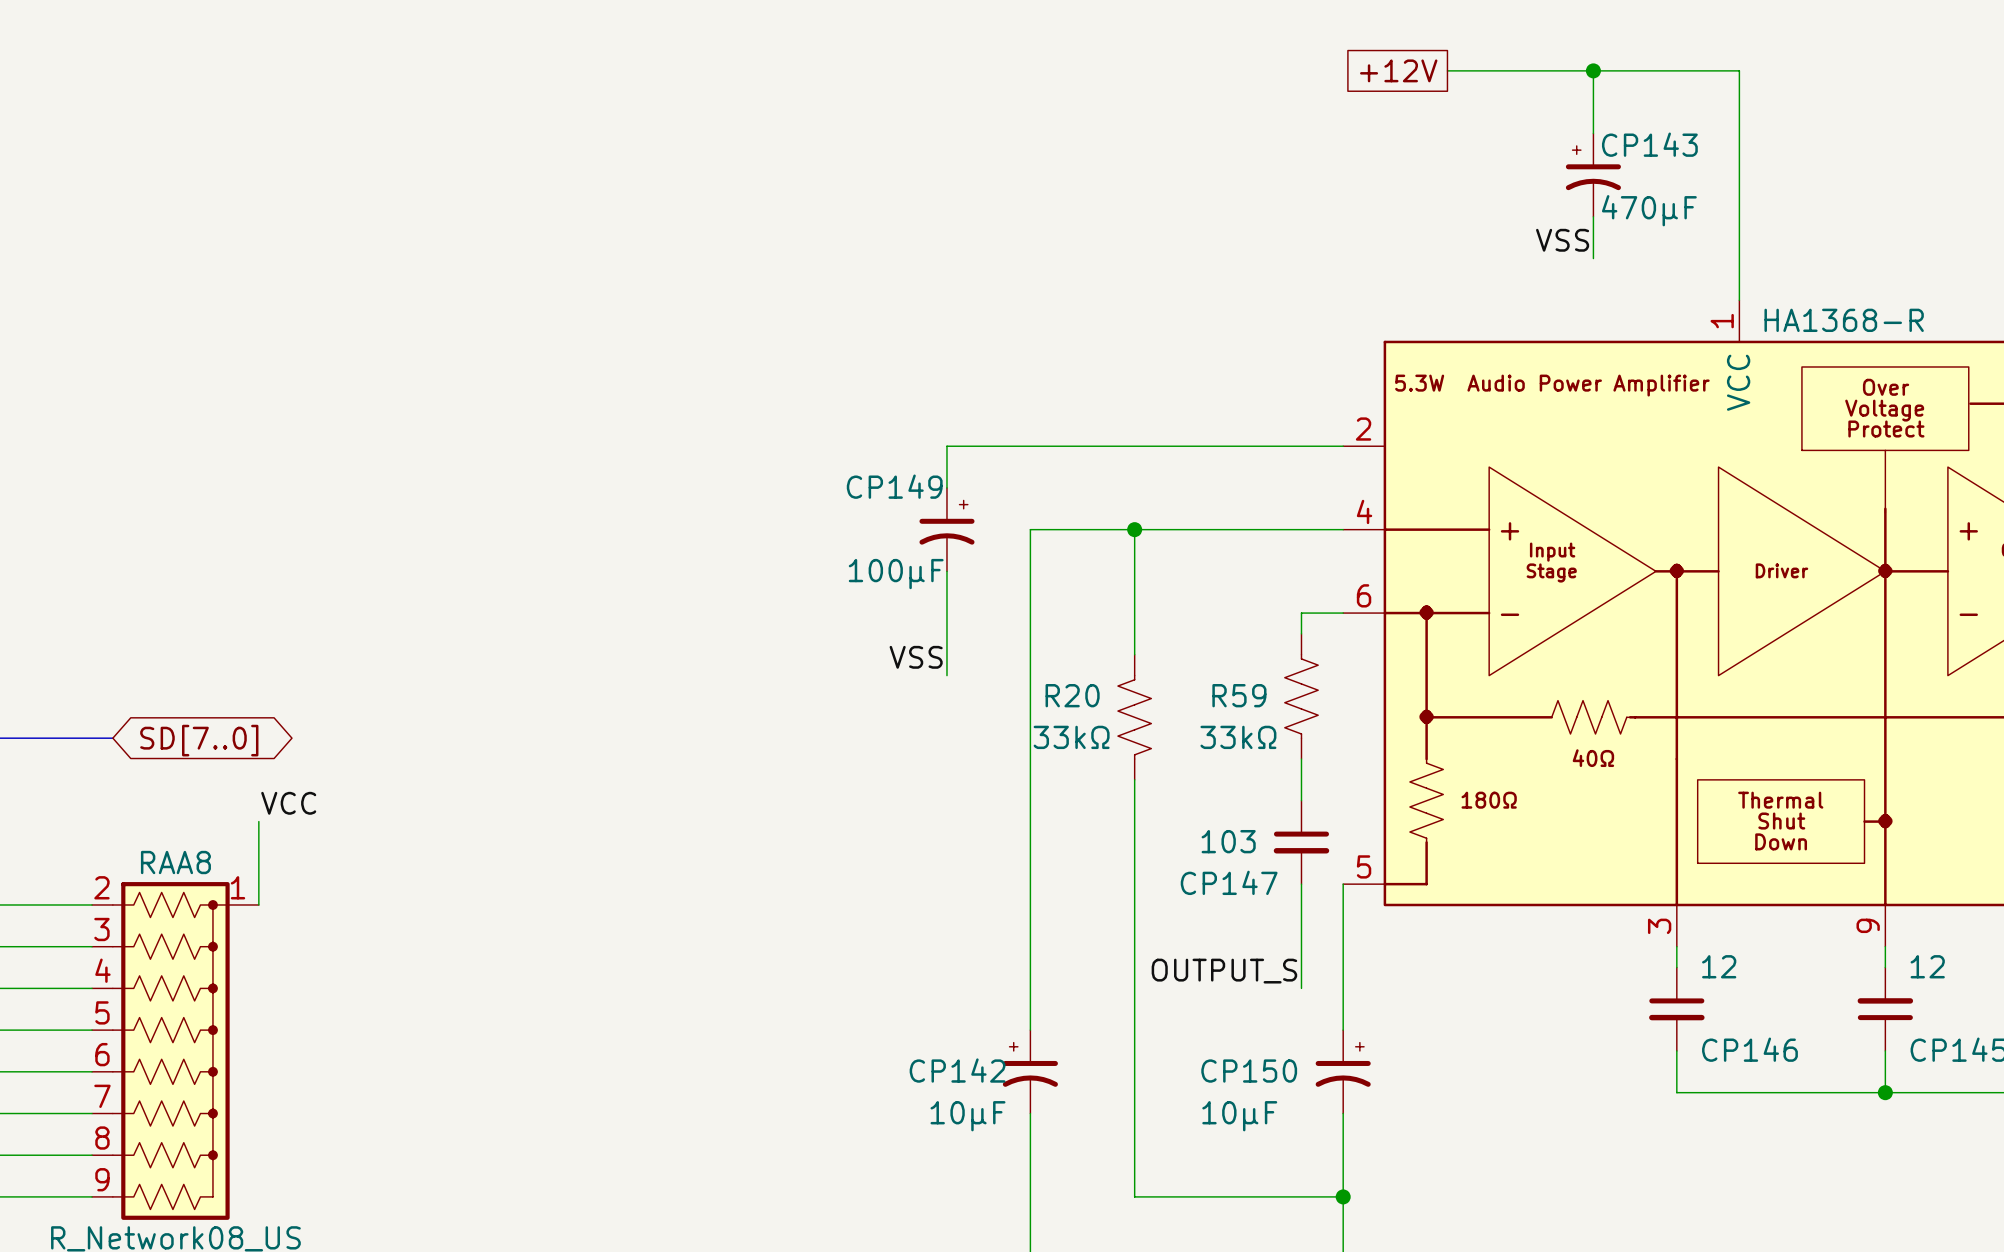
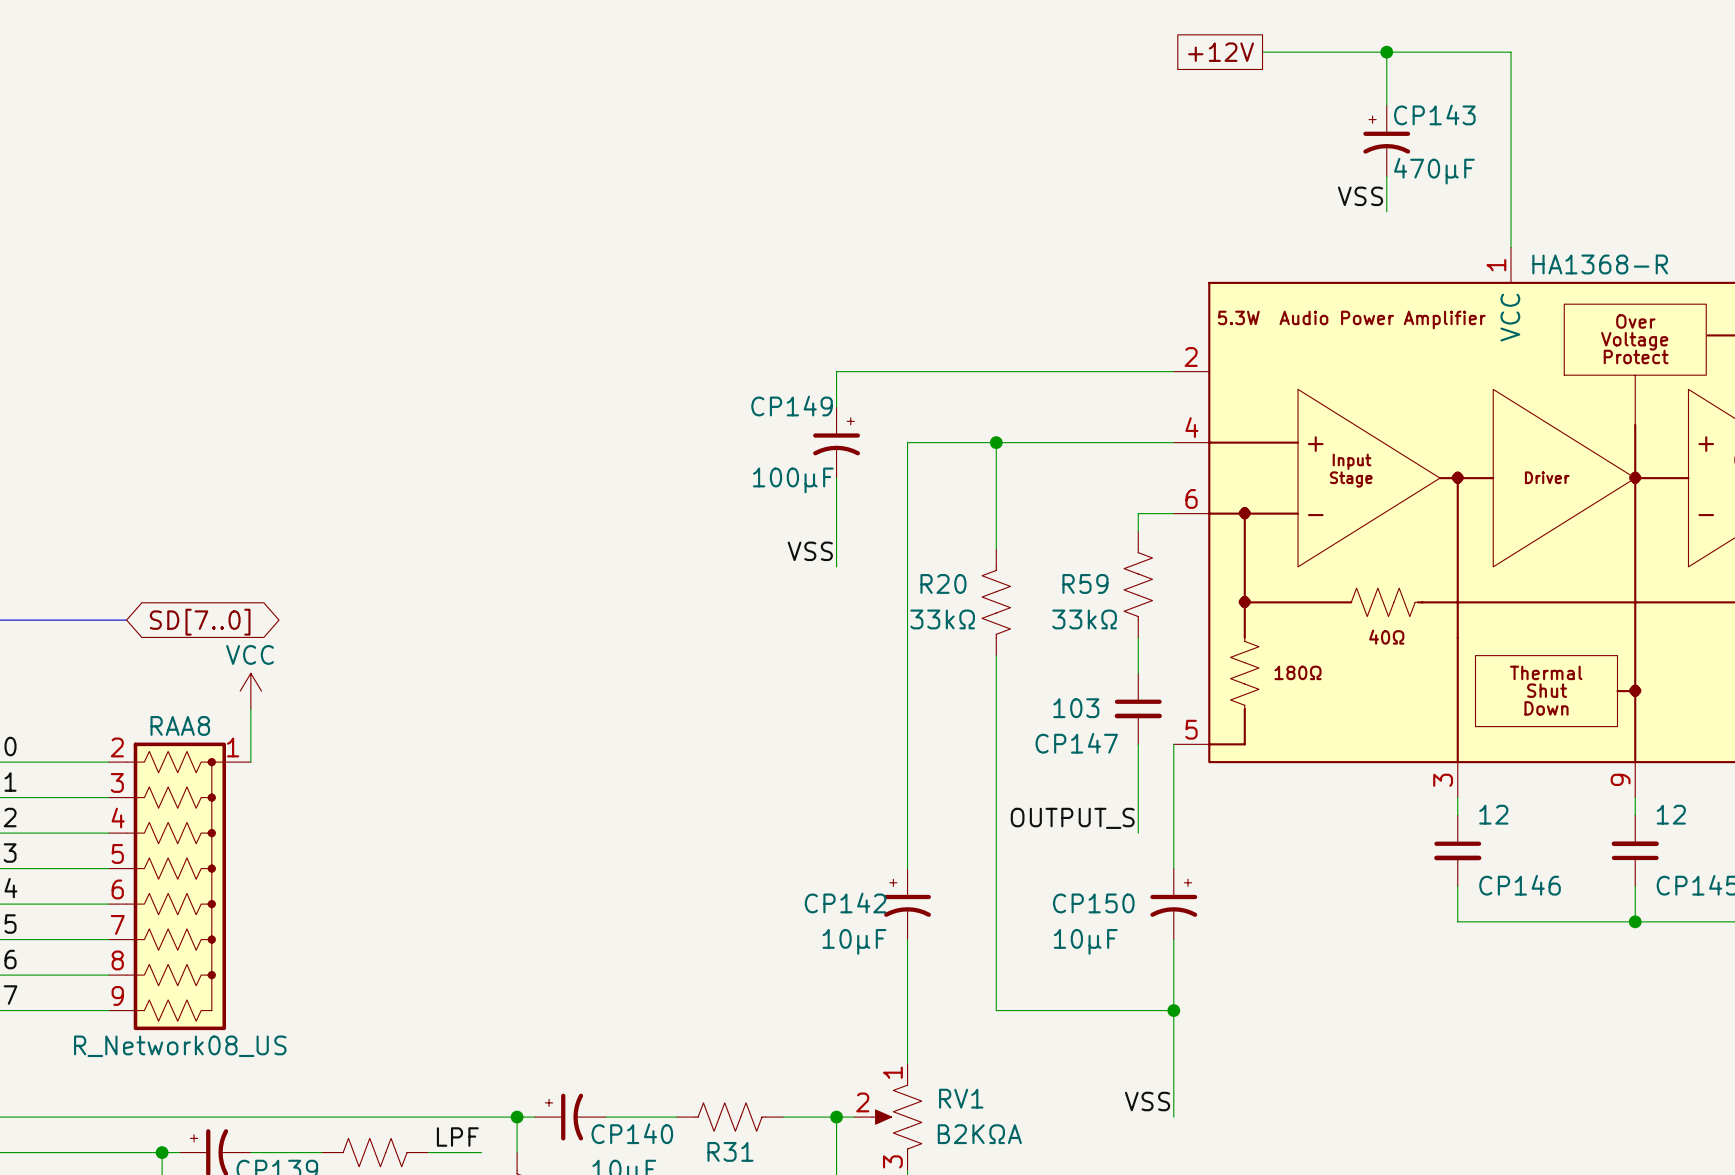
label: VCC (288, 803) -> none
power symbol: none -> VCC (250, 691)

